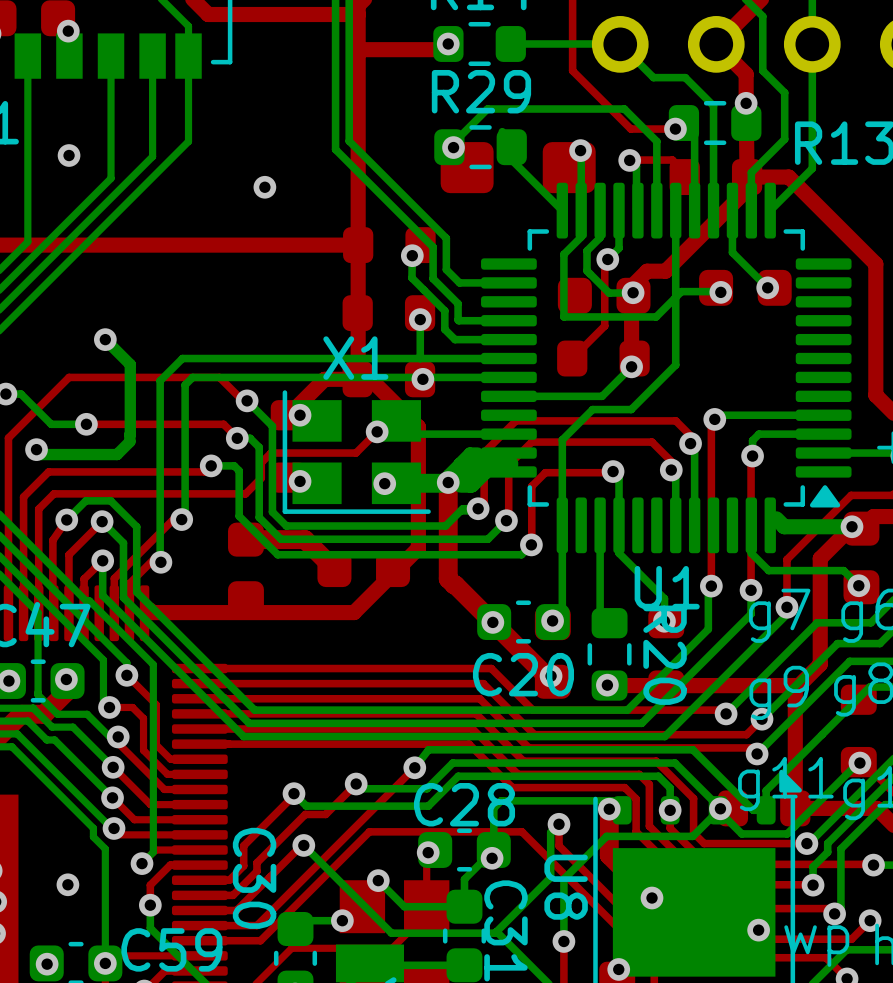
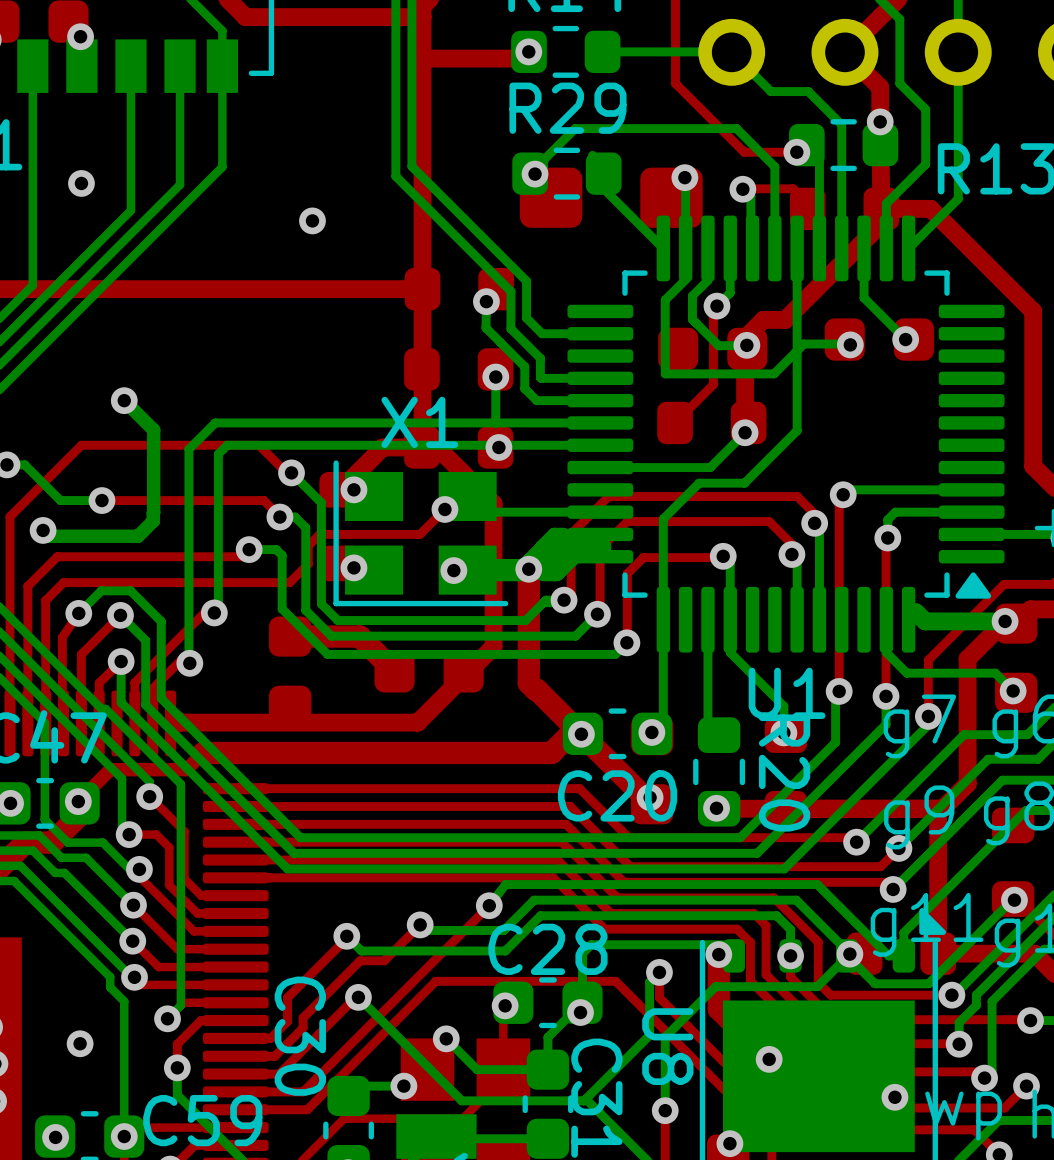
top track: none -> (581, 734) (570, 734) (551, 752) (203, 752) (186, 769) (110, 769) (78, 801)

